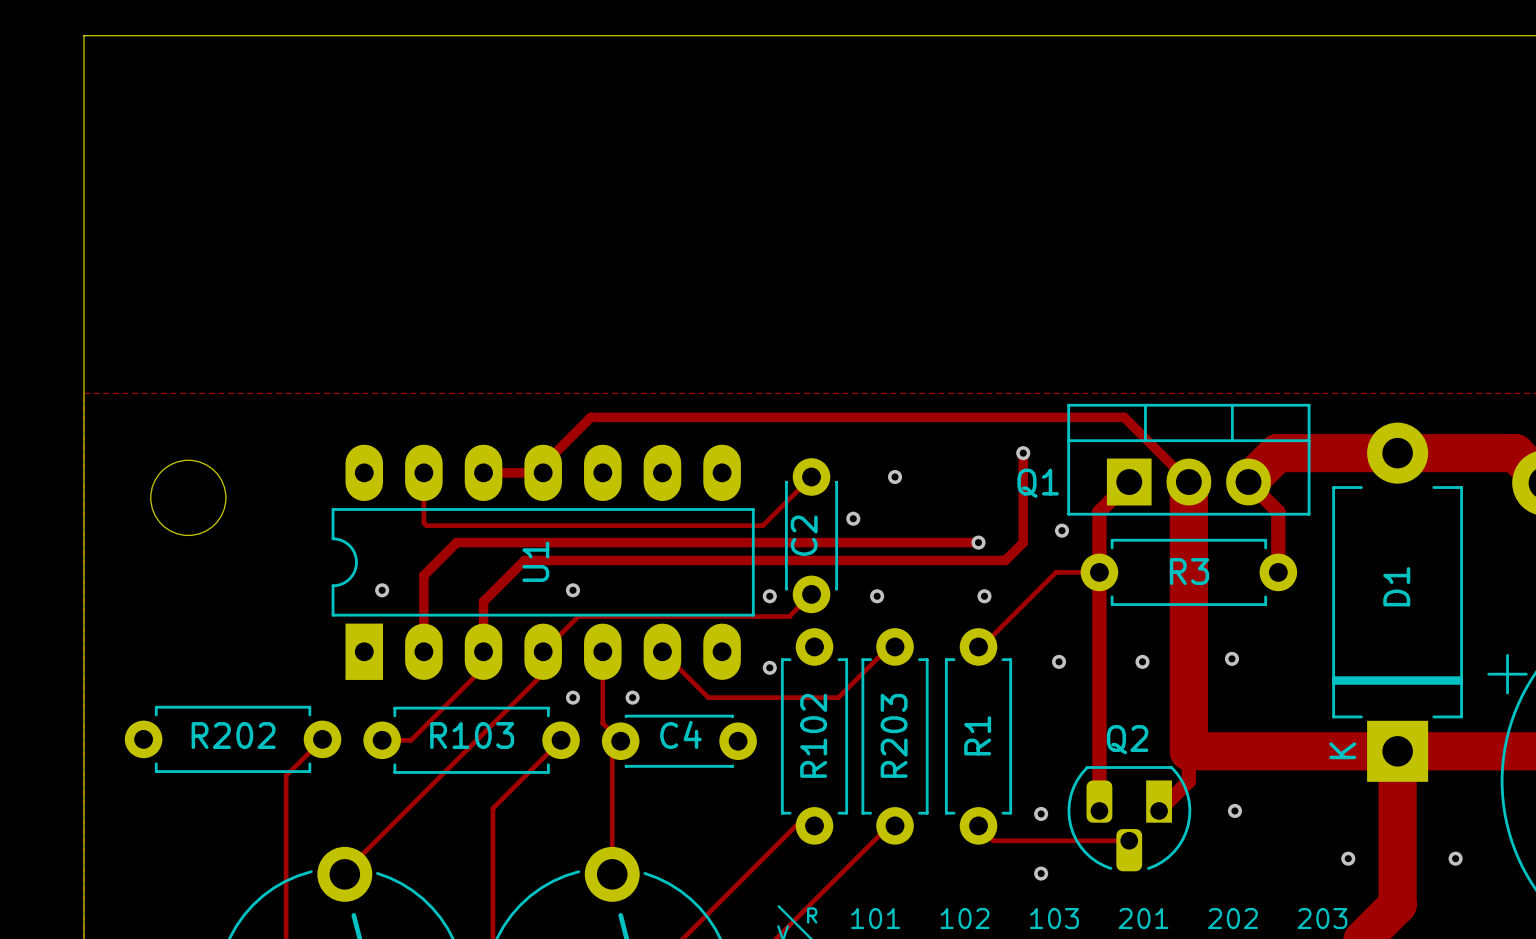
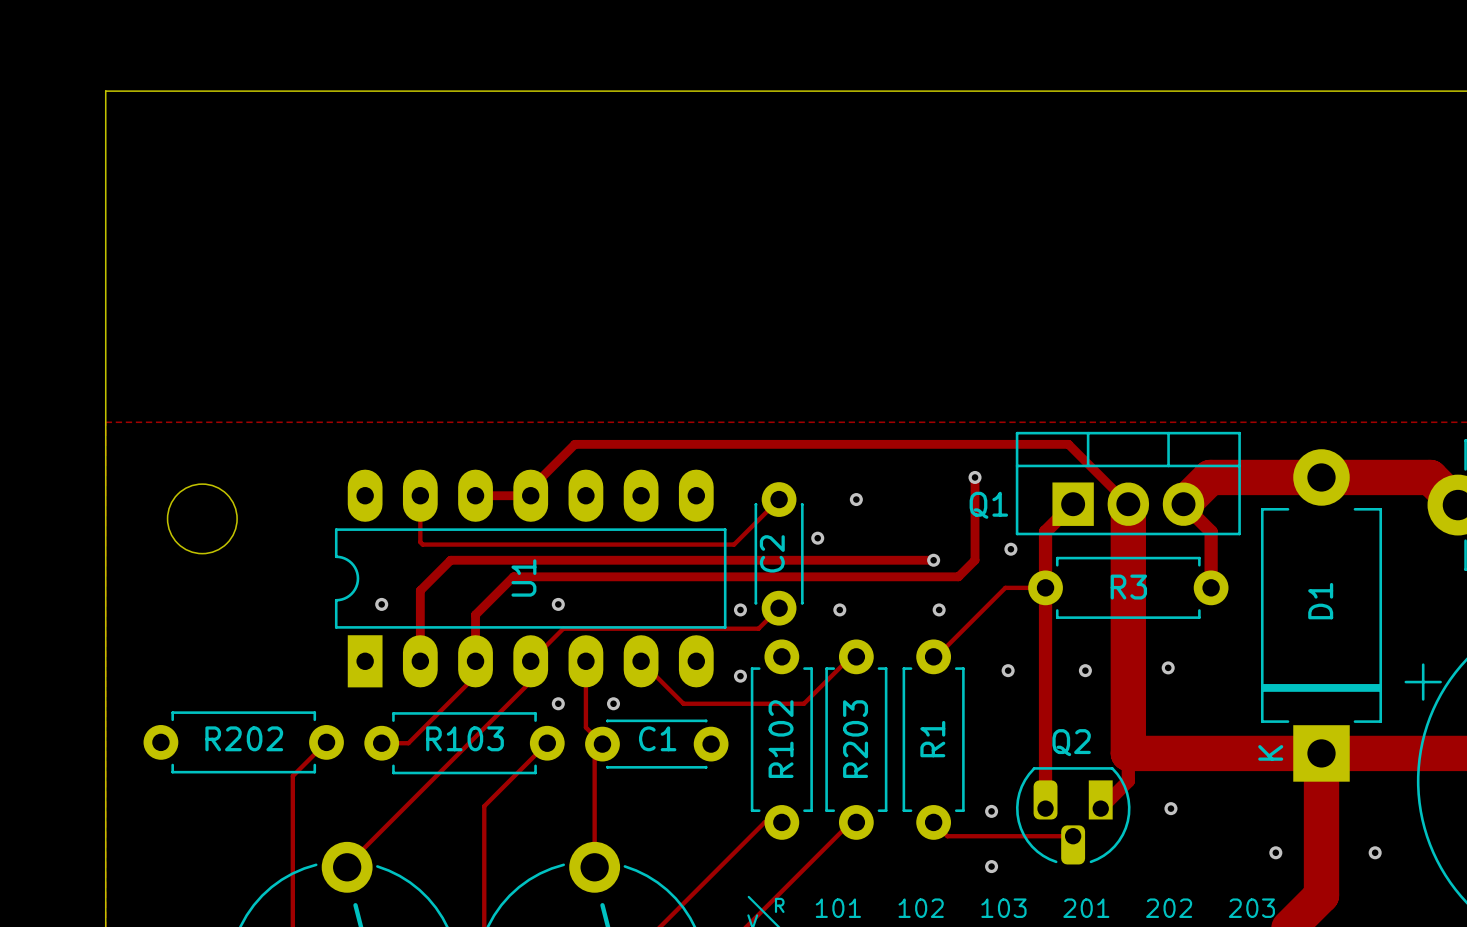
C4 name: C4 (680, 734) -> C1 (657, 738)

